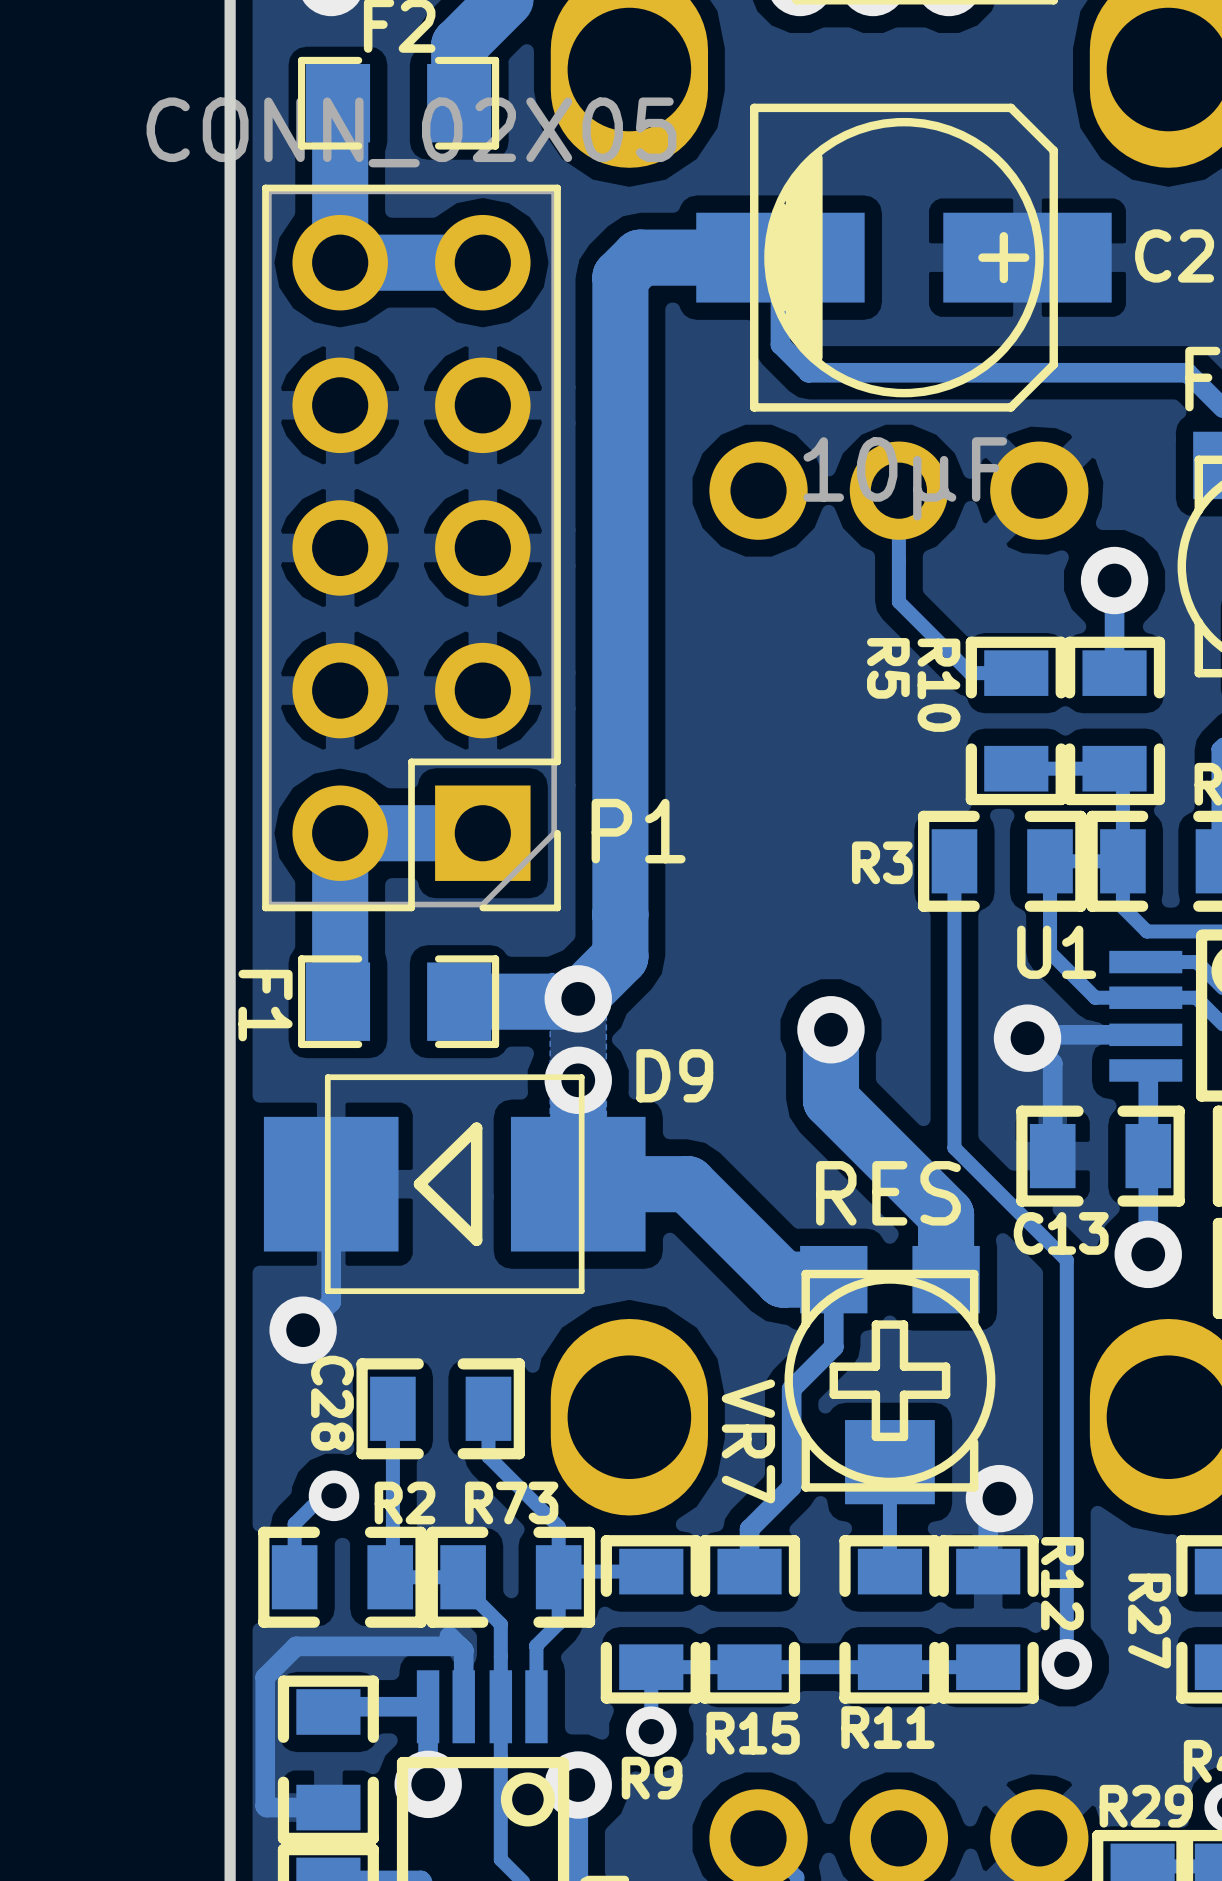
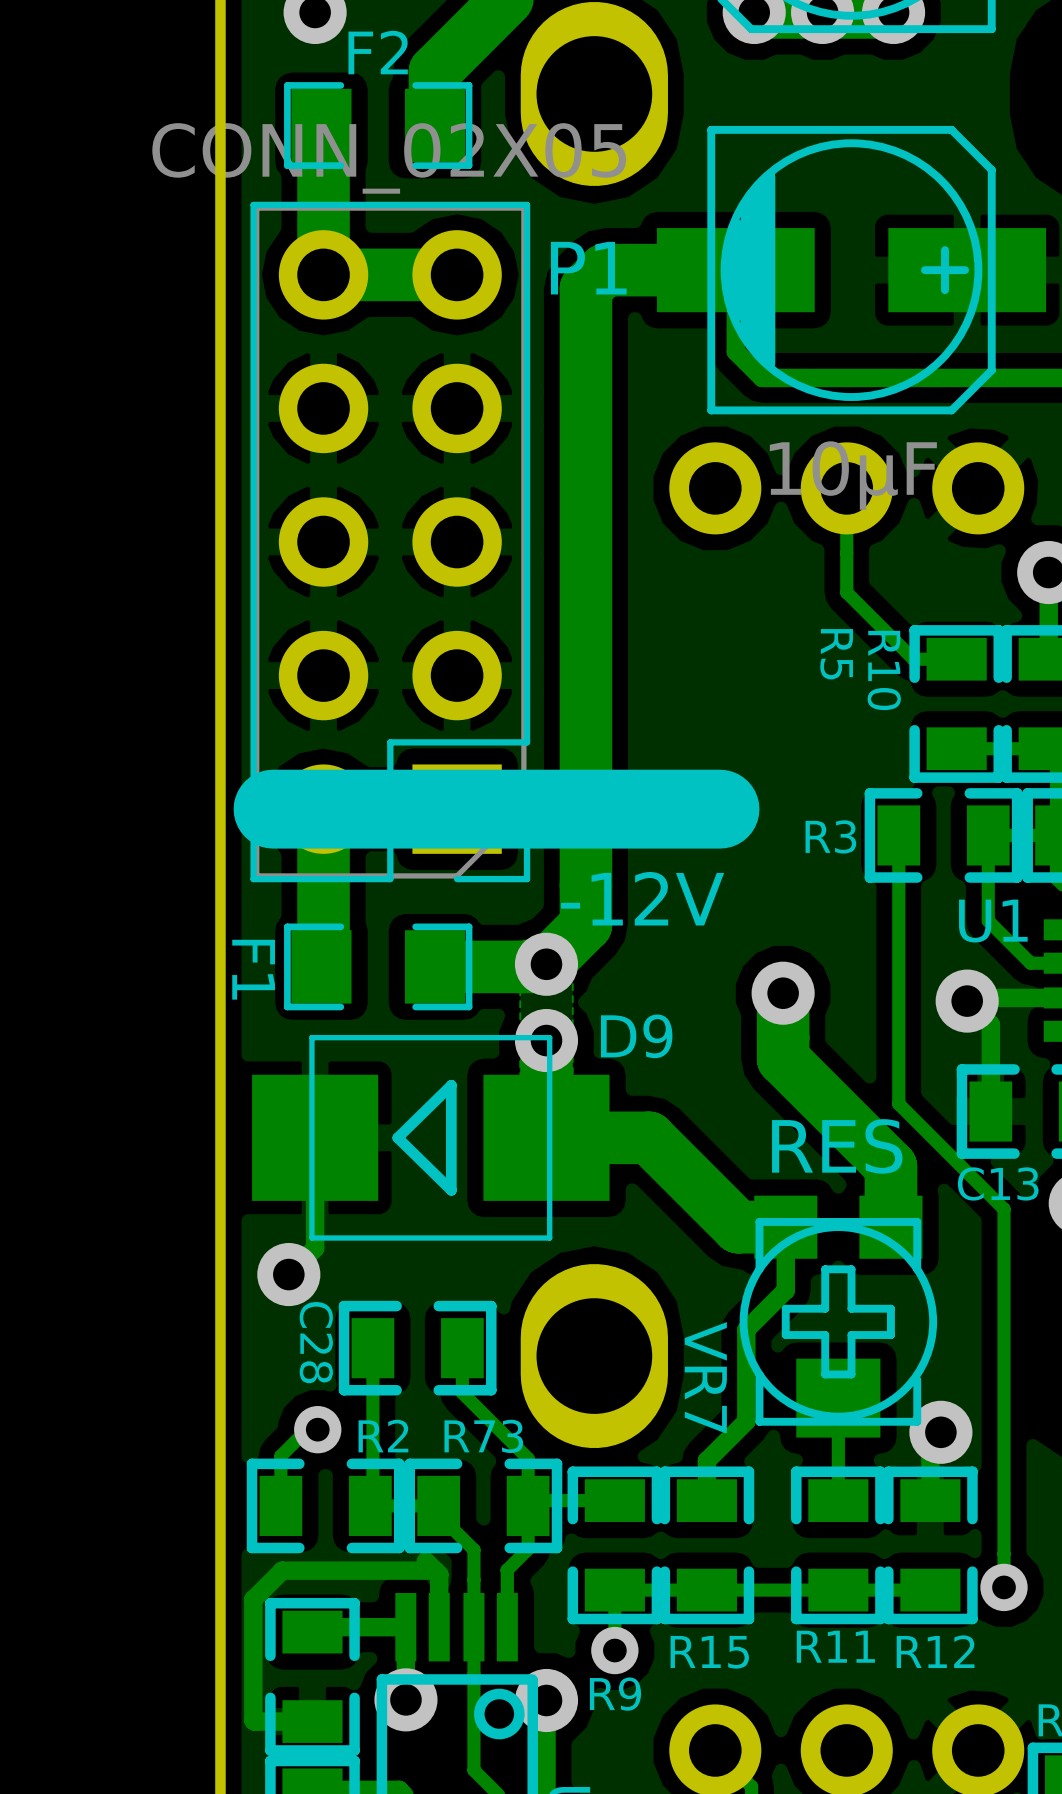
P1 name position: P1 (638, 831) -> P1 (588, 268)
line: none -> (720, 809) (273, 809)
text: none -> -12V (642, 898)
R12 name rotation: 0° (1062, 1583) -> 90° counterclockwise (935, 1651)
R12 name position: R12 (1062, 1583) -> R12 (935, 1651)

